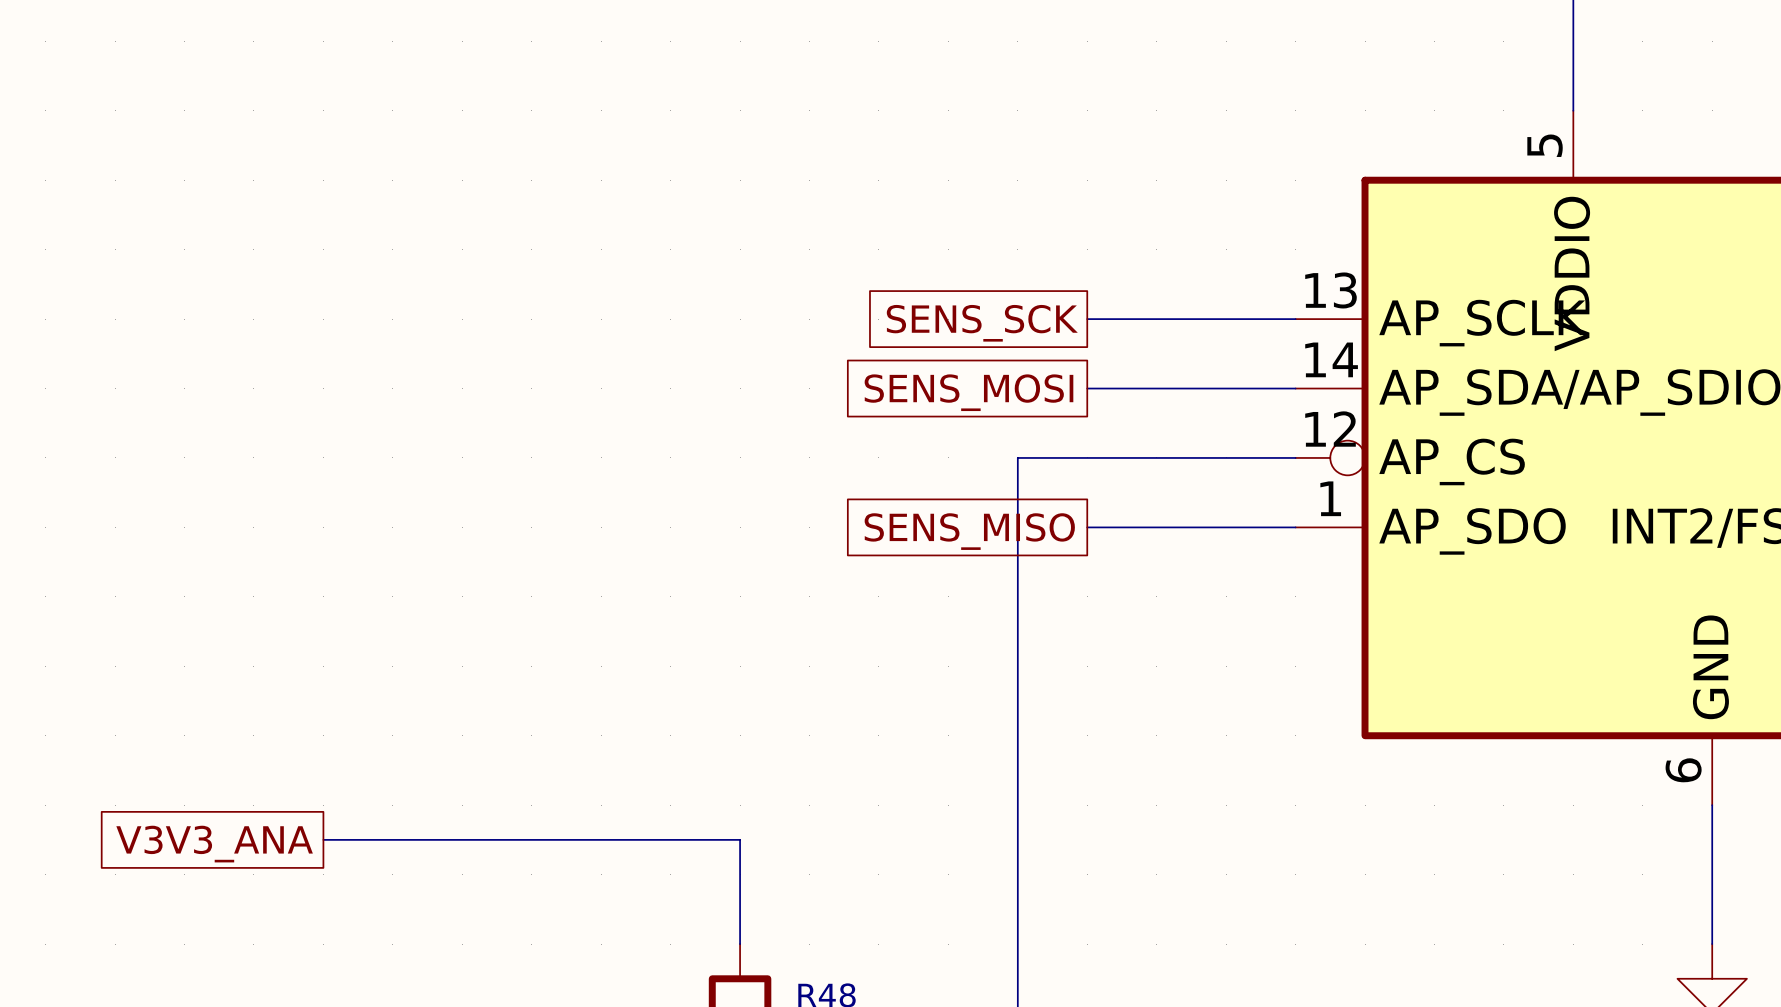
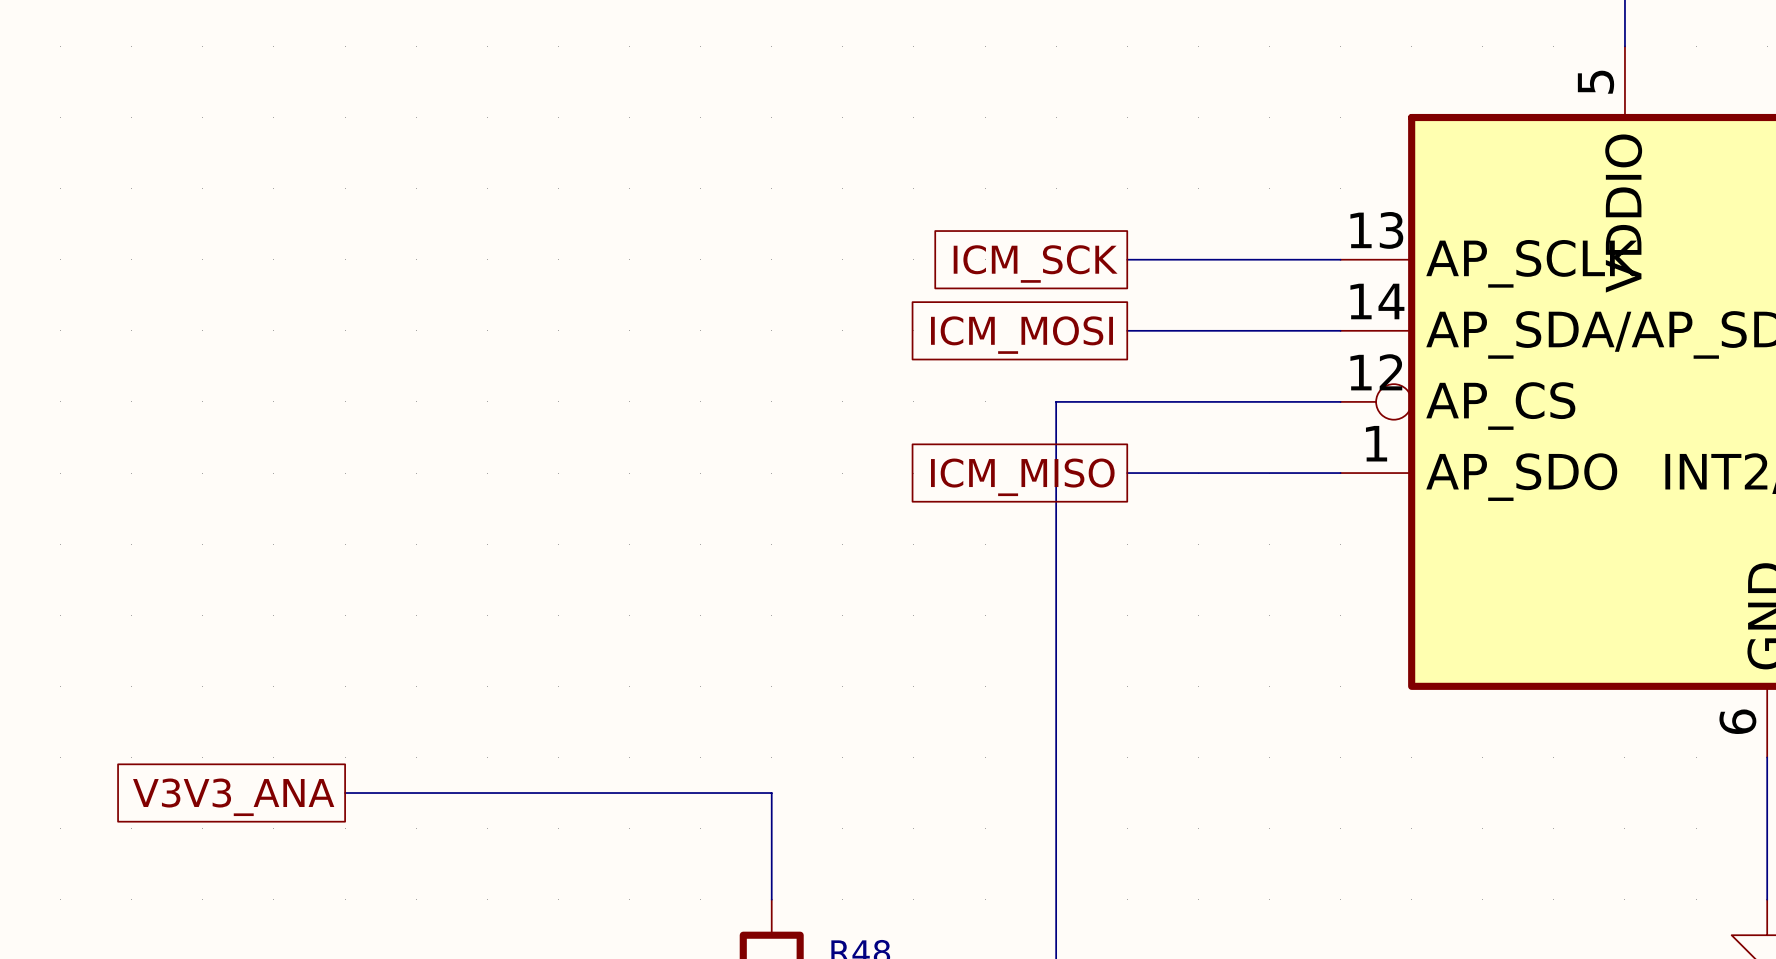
global label: SENS_SCK (982, 323) -> ICM_SCK (1035, 263)
global label: SENS_MOSI (968, 392) -> ICM_MOSI (1021, 335)
global label: SENS_MISO (969, 531) -> ICM_MISO (1022, 477)

